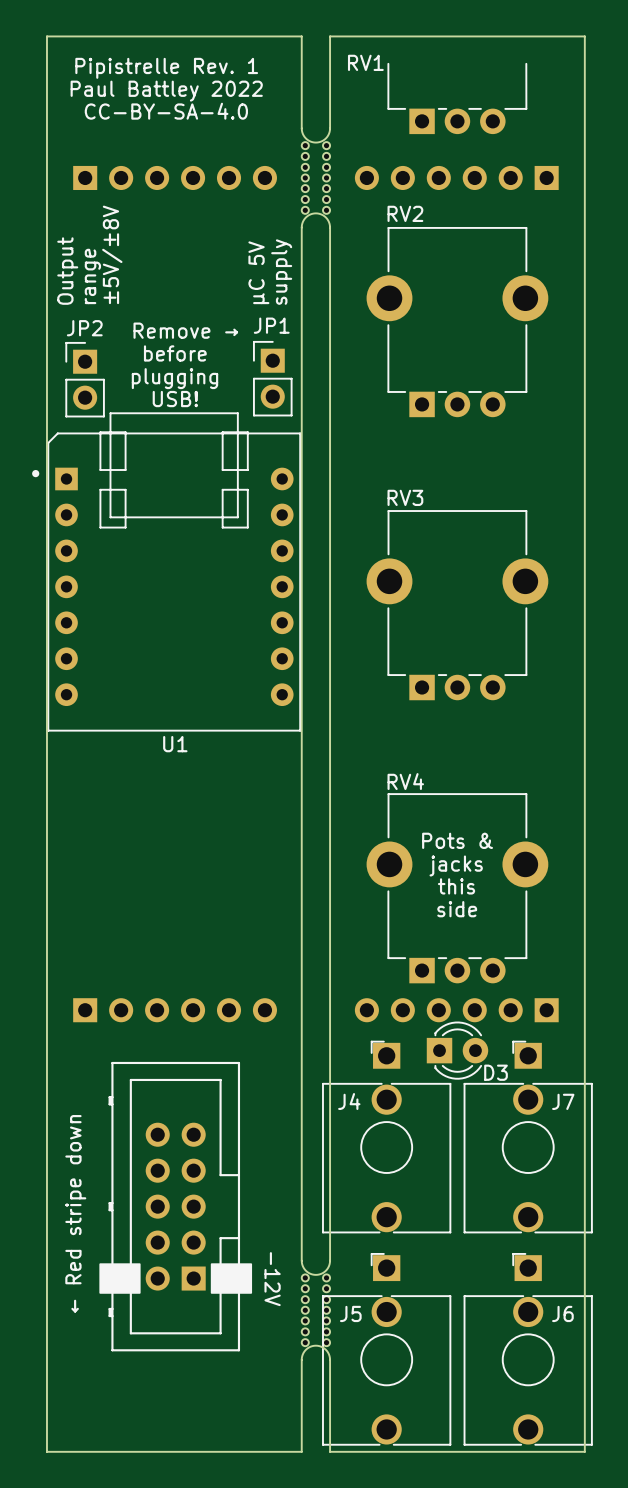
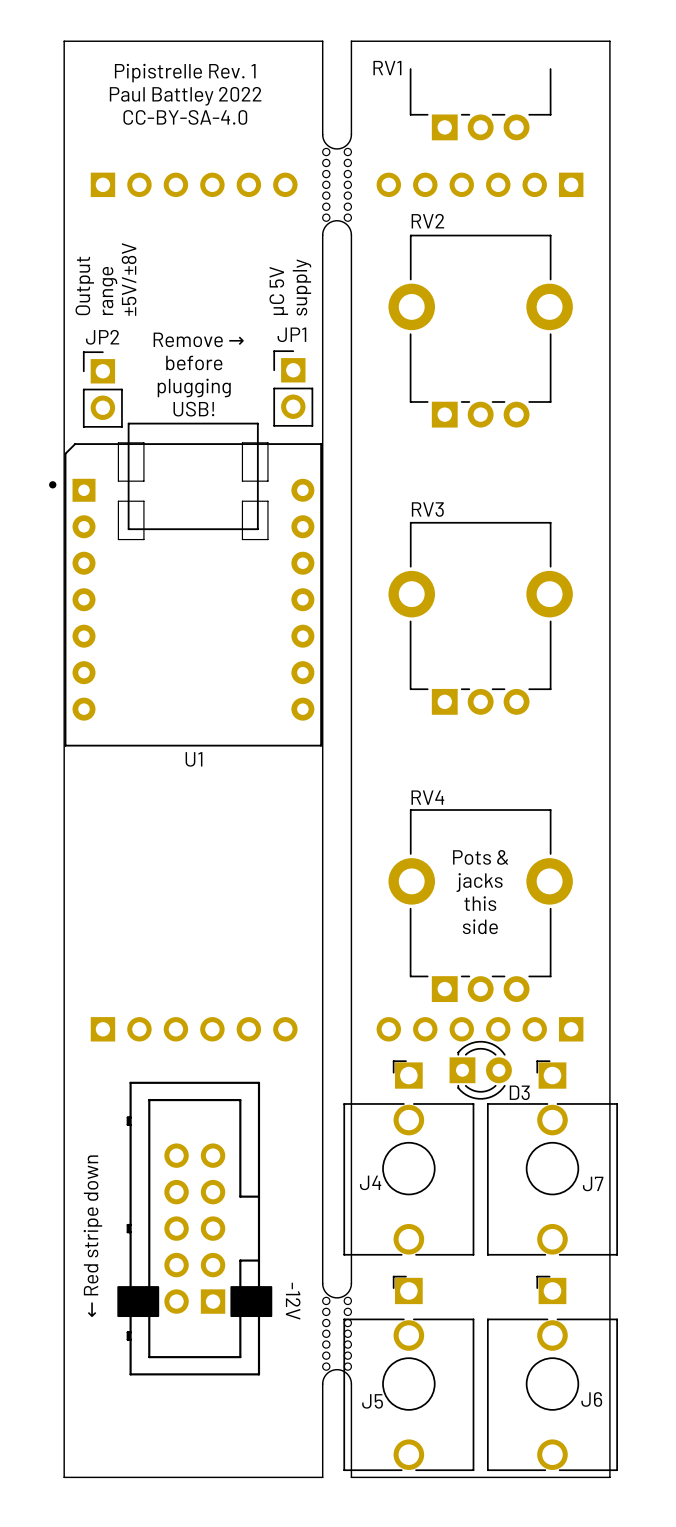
J4 name position: J4 (349, 1101) -> J4 (370, 1182)
J7 name position: J7 (563, 1101) -> J7 (593, 1183)
J5 name position: J5 (350, 1313) -> J5 (372, 1401)
J6 name position: J6 (562, 1313) -> J6 (591, 1399)

